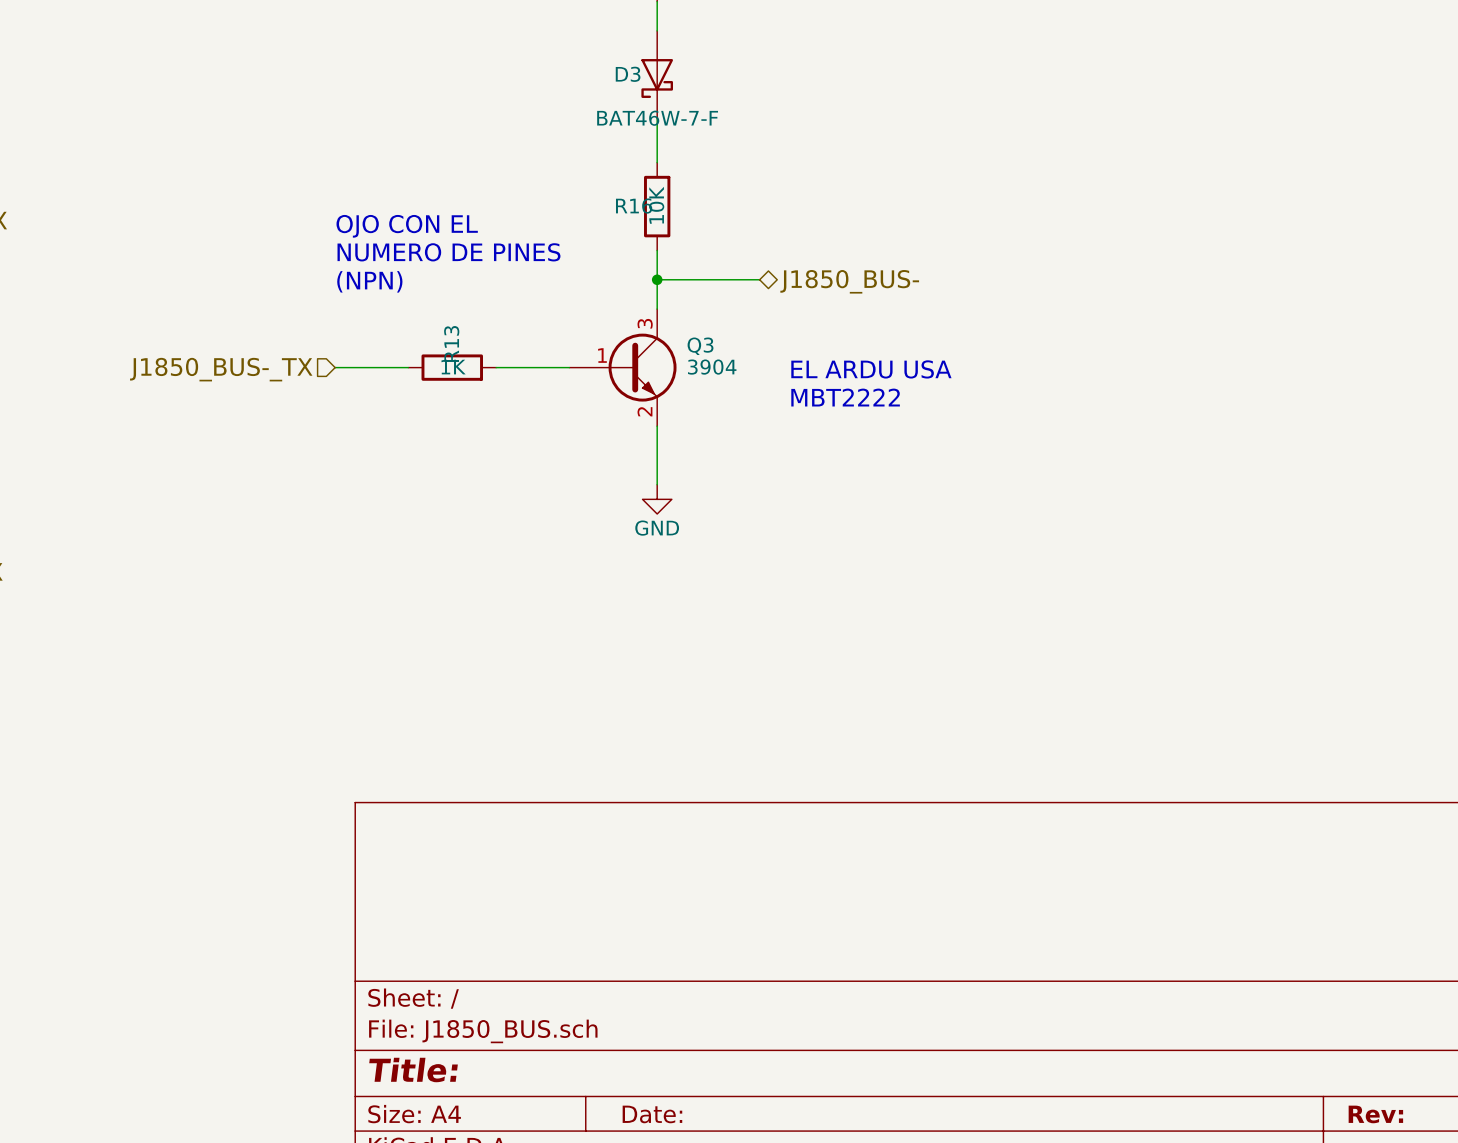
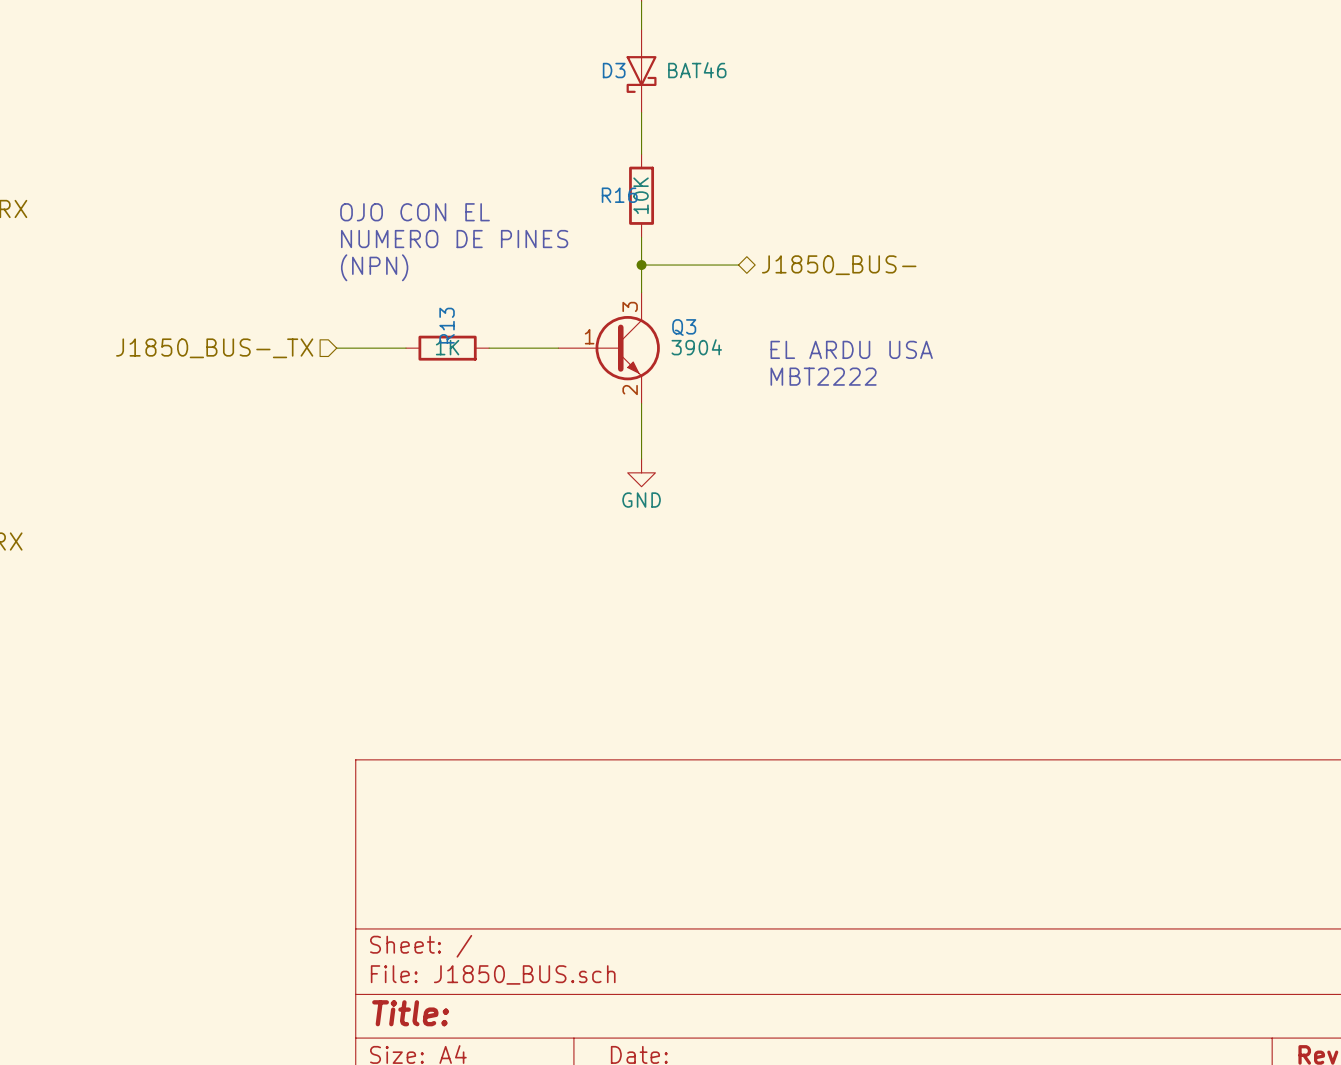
D3 value: BAT46W-7-F (657, 118) -> BAT46 (697, 70)

